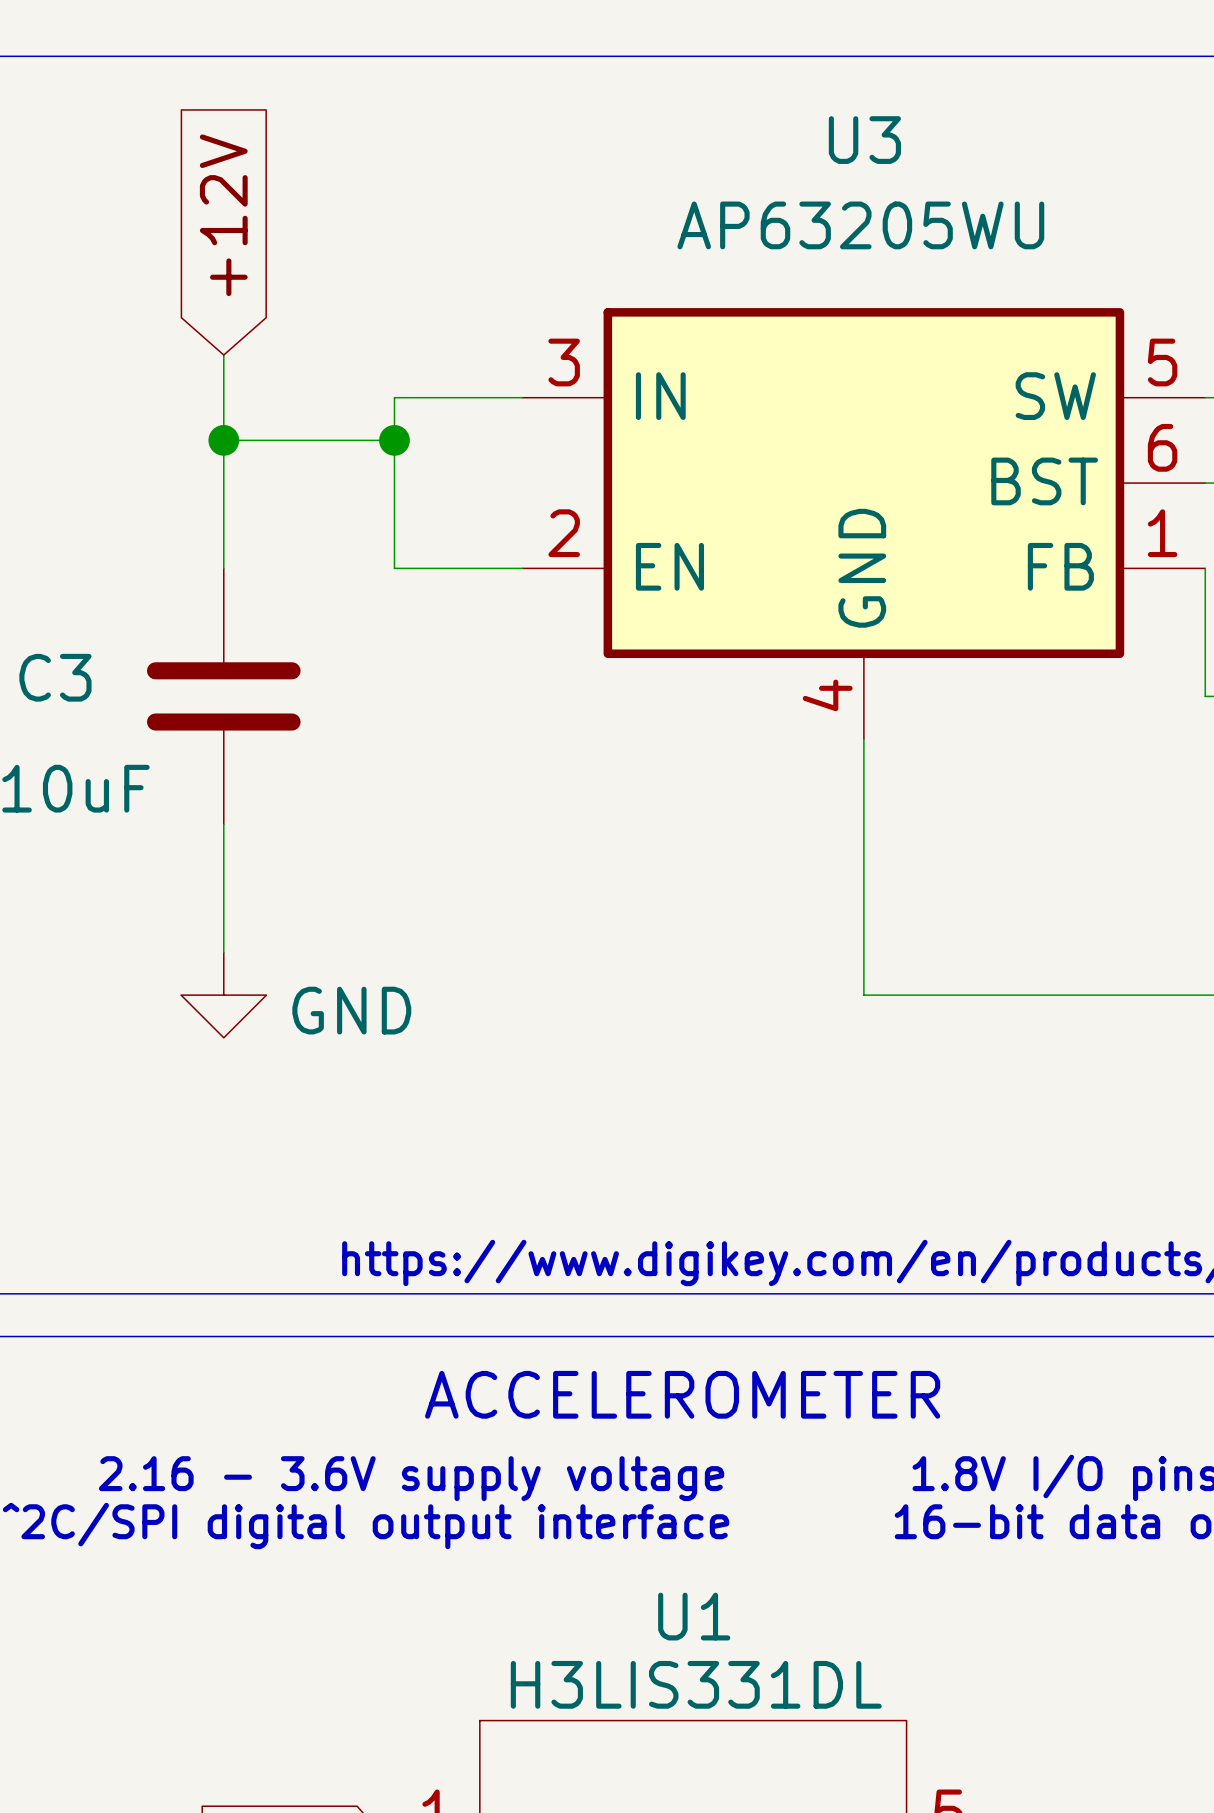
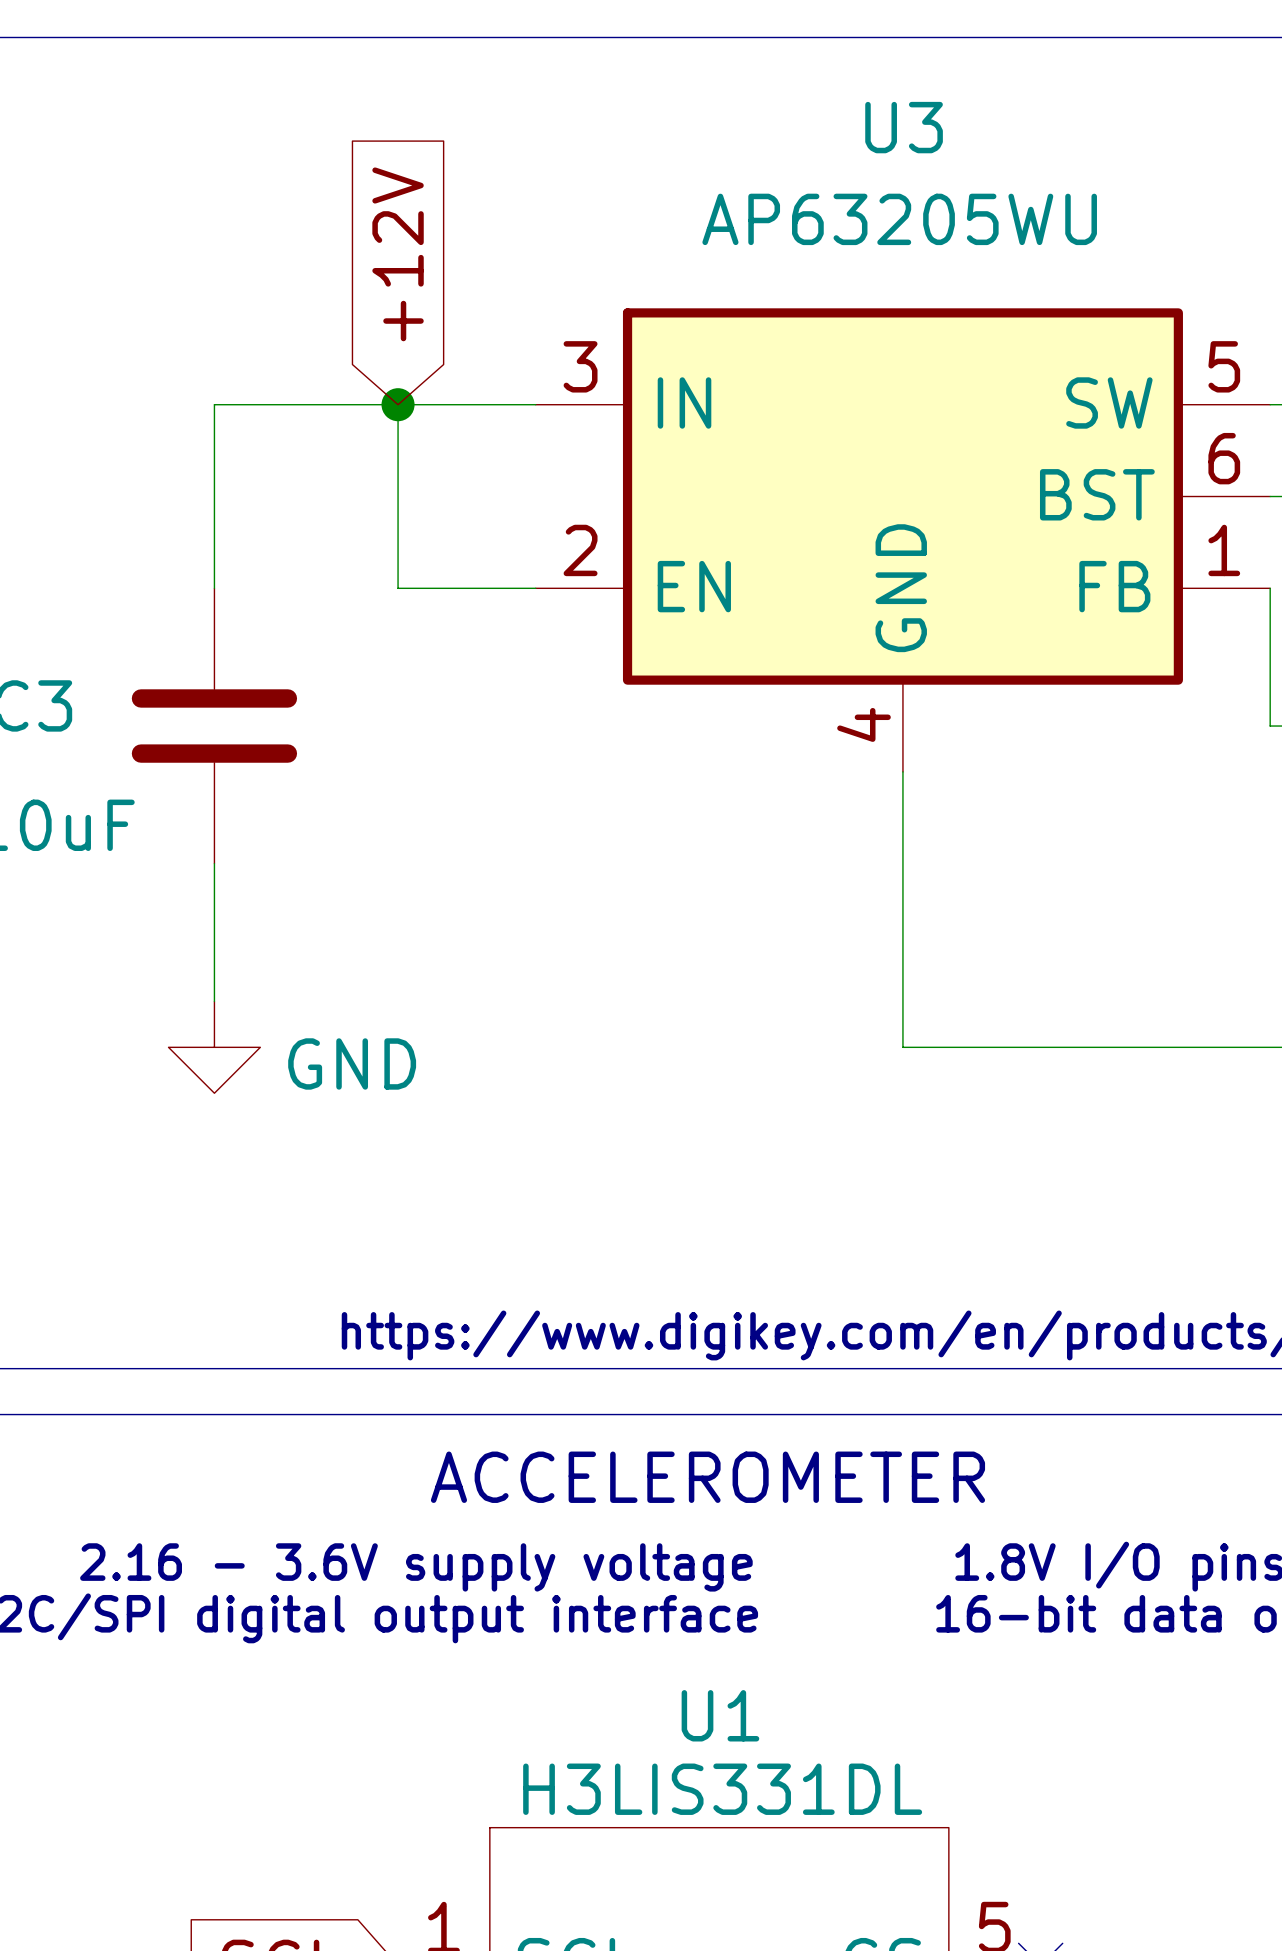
global label position: +12V (223, 215) -> +12V (398, 254)
wire: (223, 355) (223, 397) -> (398, 404) (214, 404)
wire: (223, 440) (394, 440) -> none
junction: (223, 440) -> none
junction position: (394, 440) -> (398, 404)

